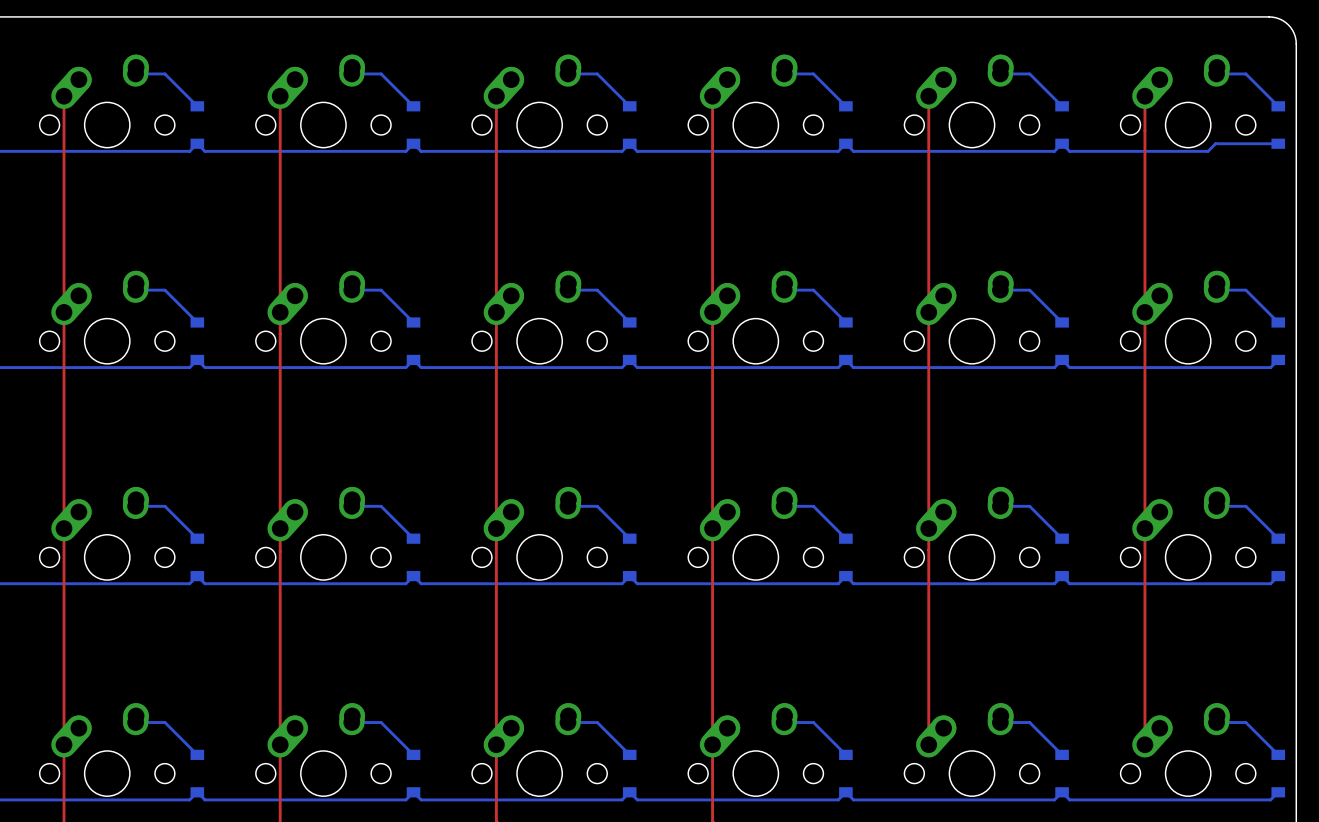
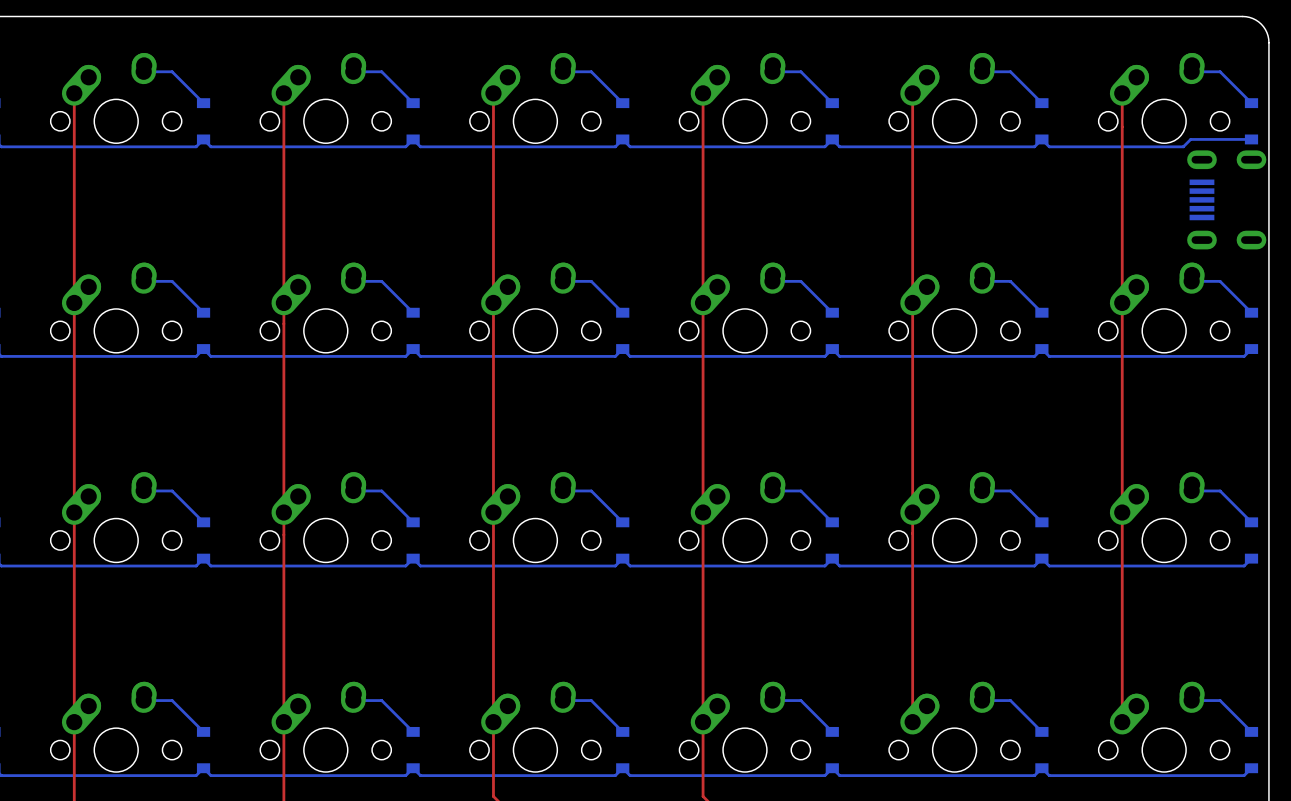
part: none -> (1226, 199)

